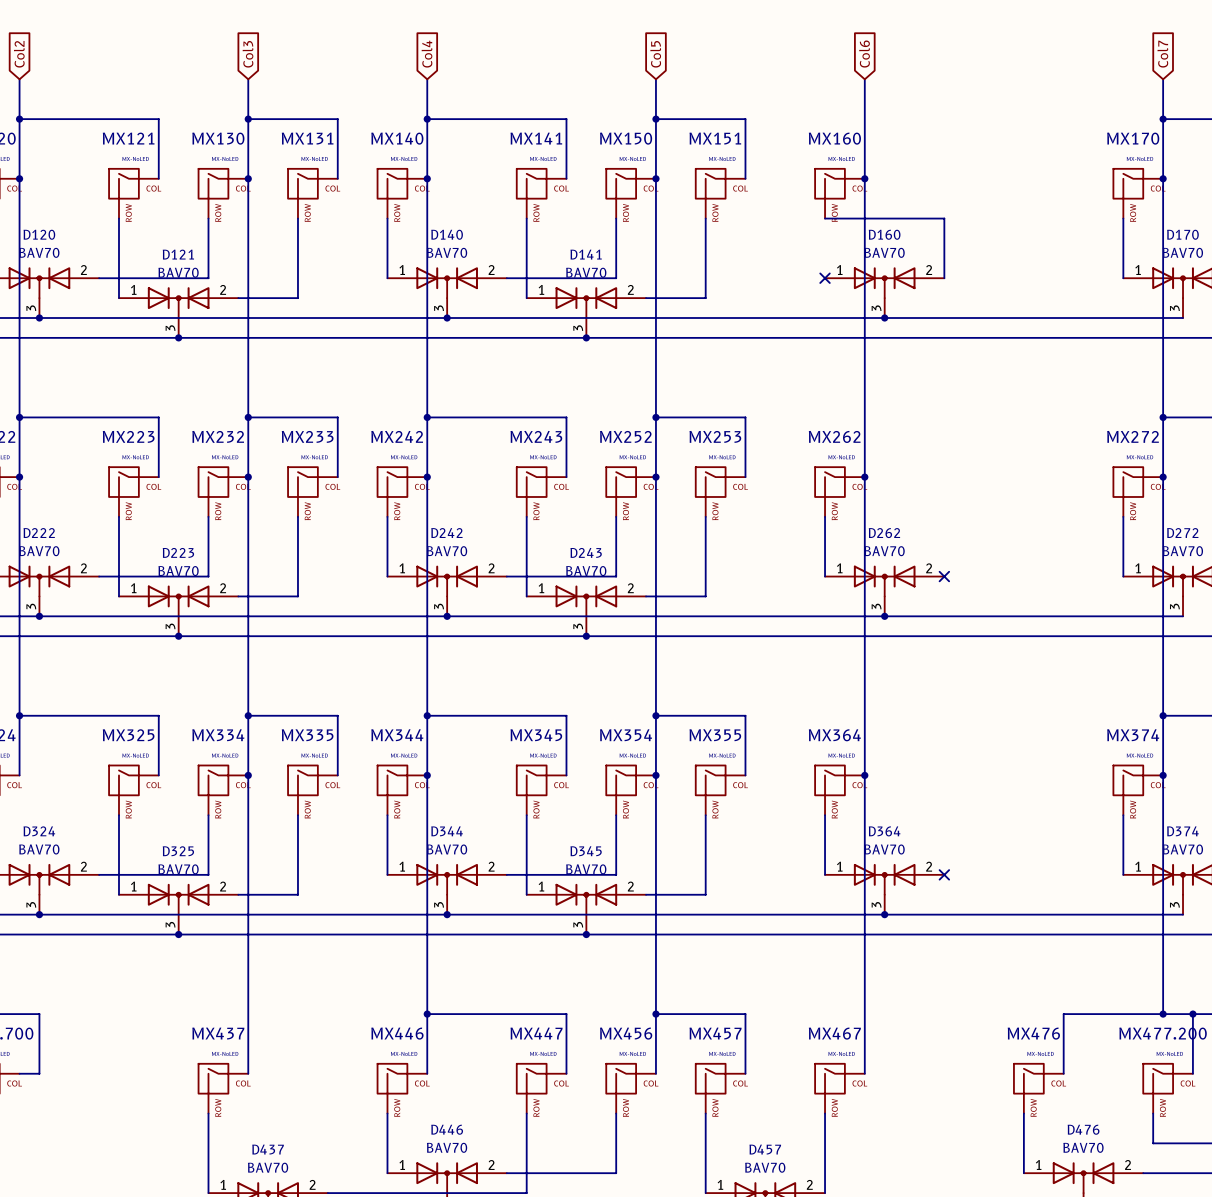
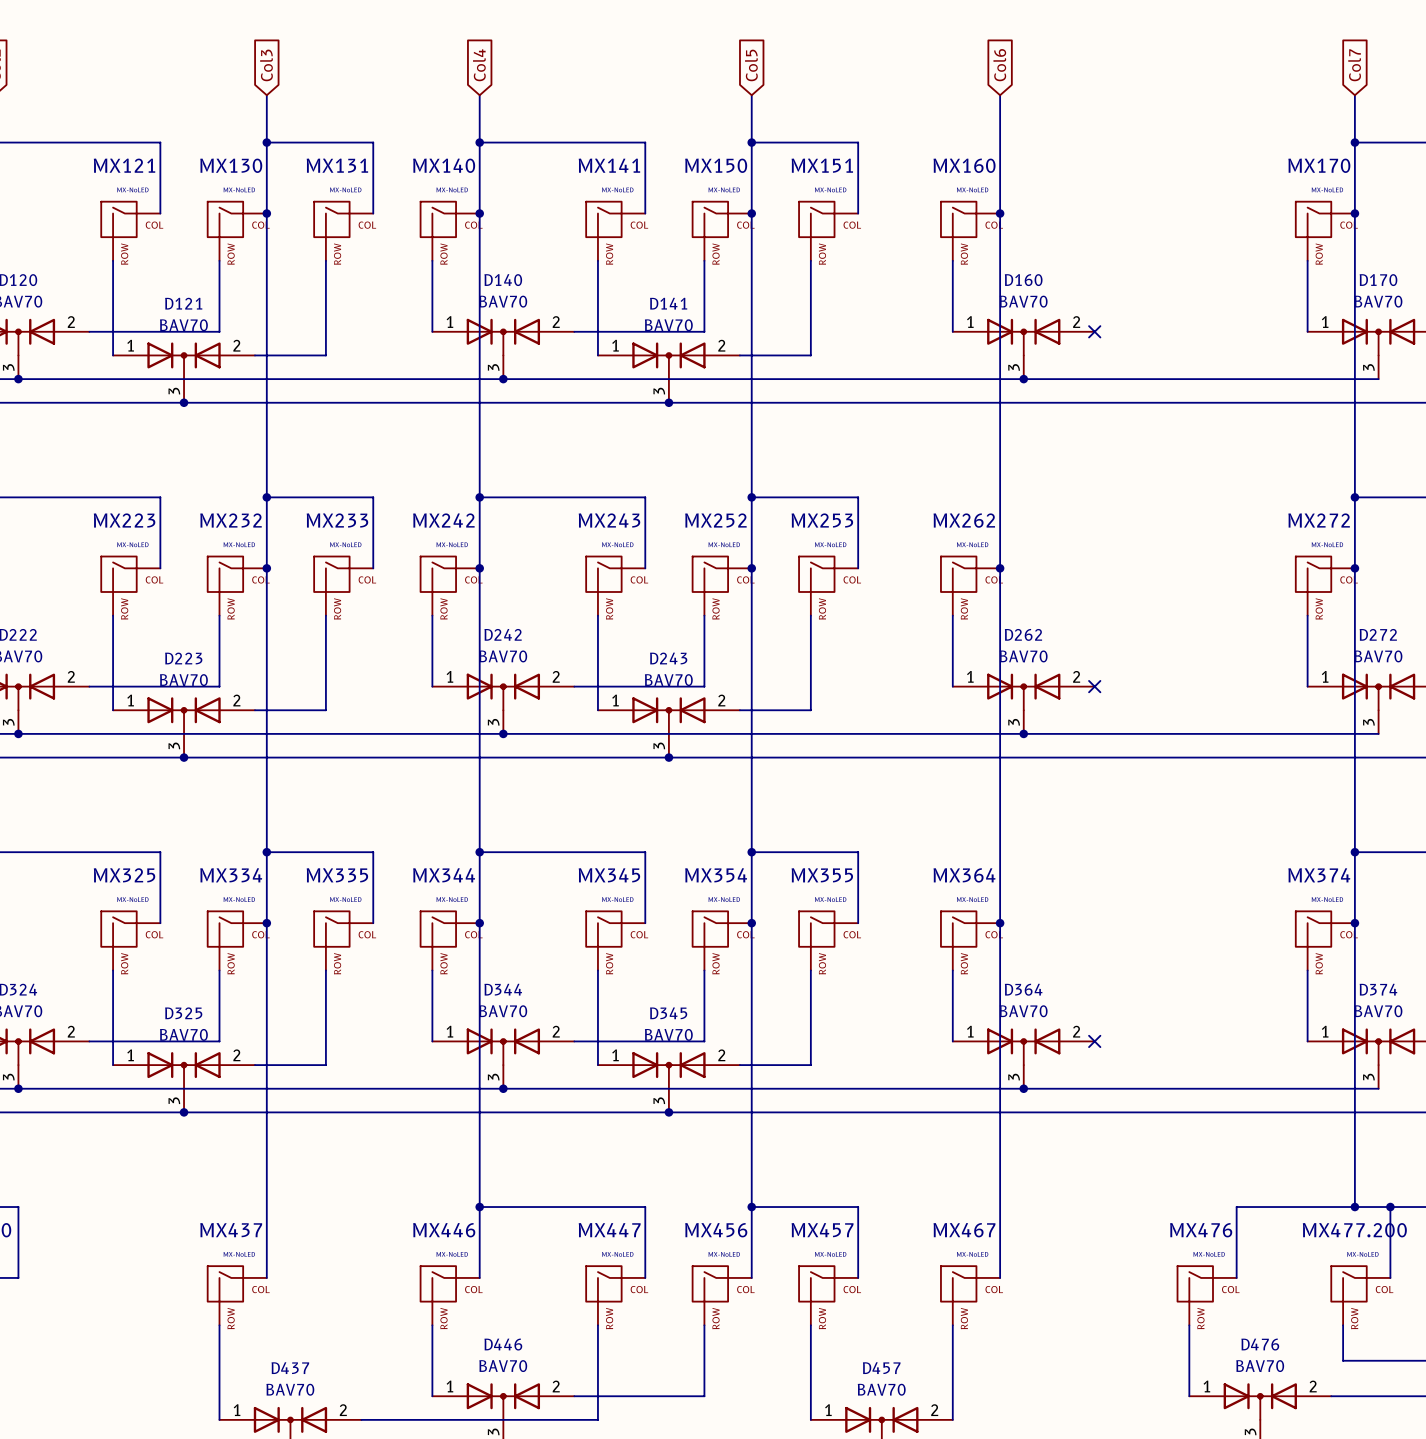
wire: (825, 218) (944, 218) (944, 278) -> (952, 260) (952, 331)
no-connect mark: (825, 278) -> none
no-connect mark: none -> (1094, 331)

